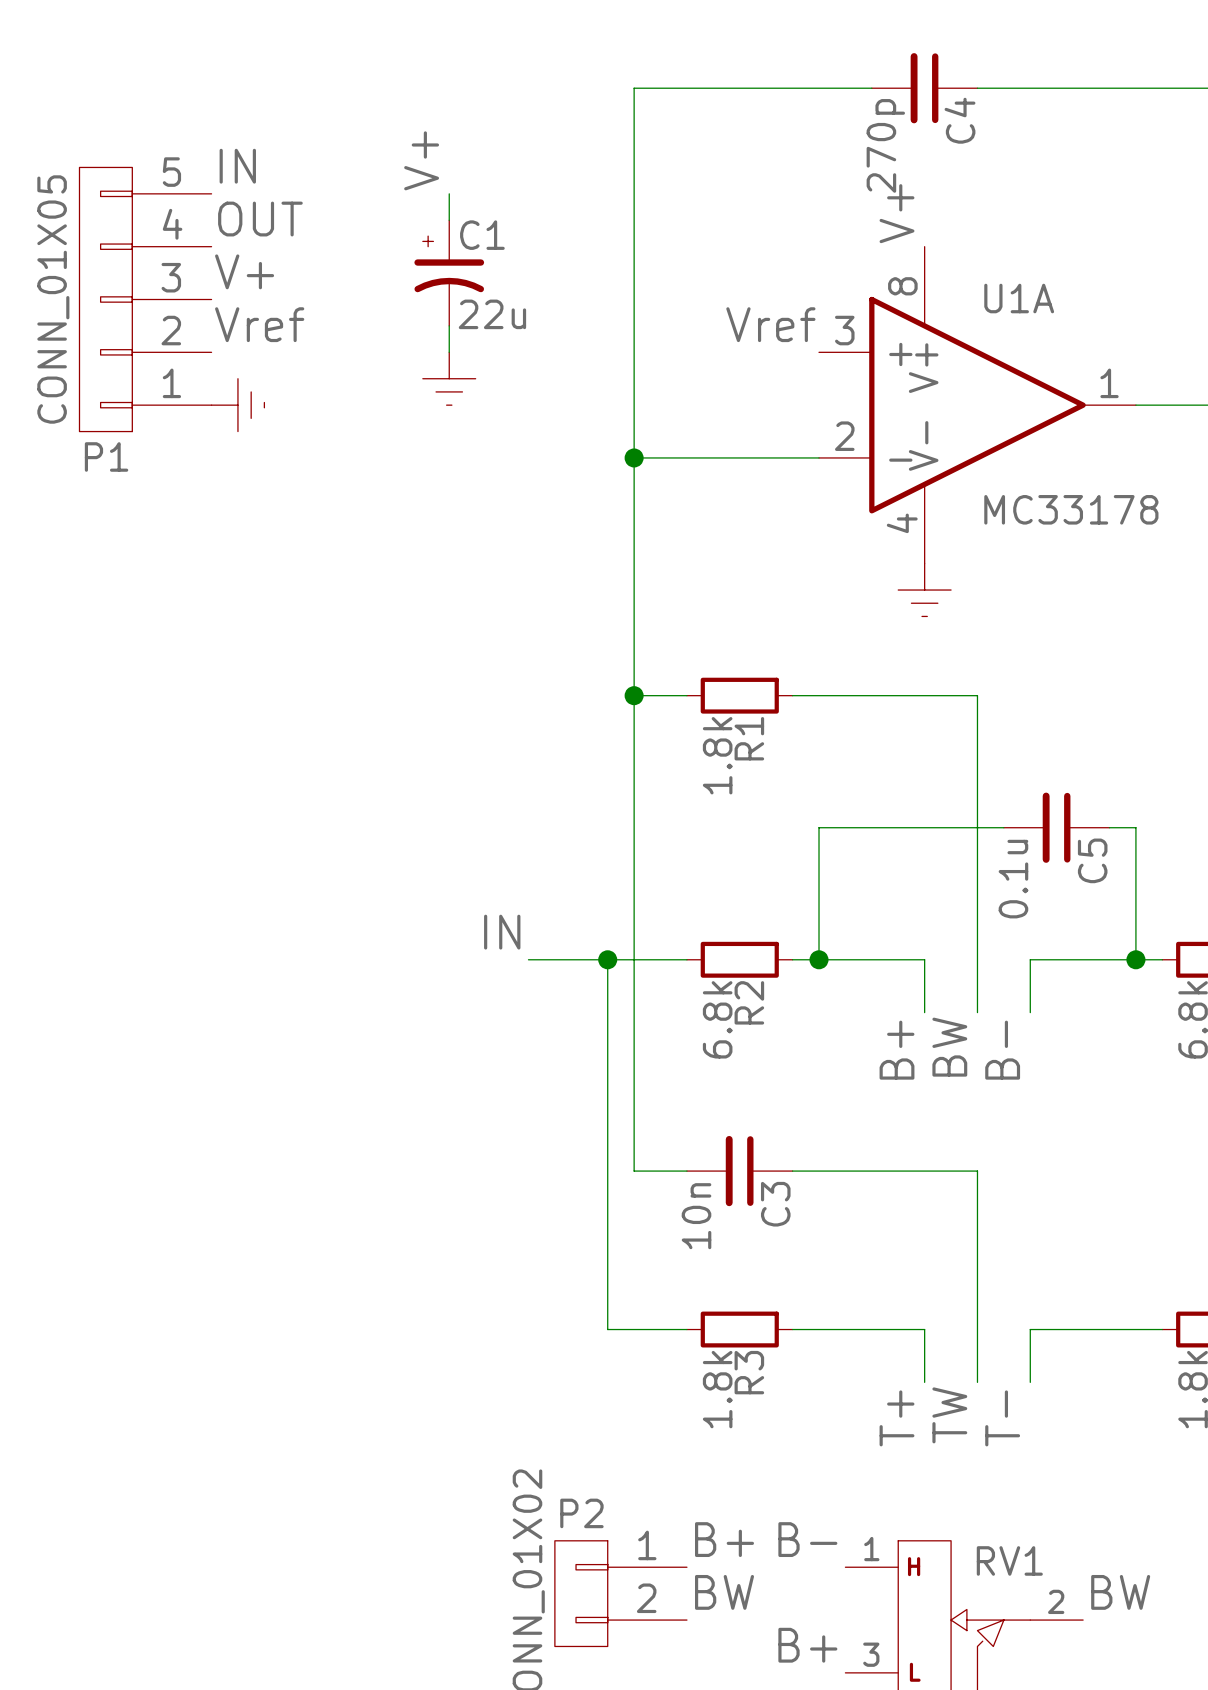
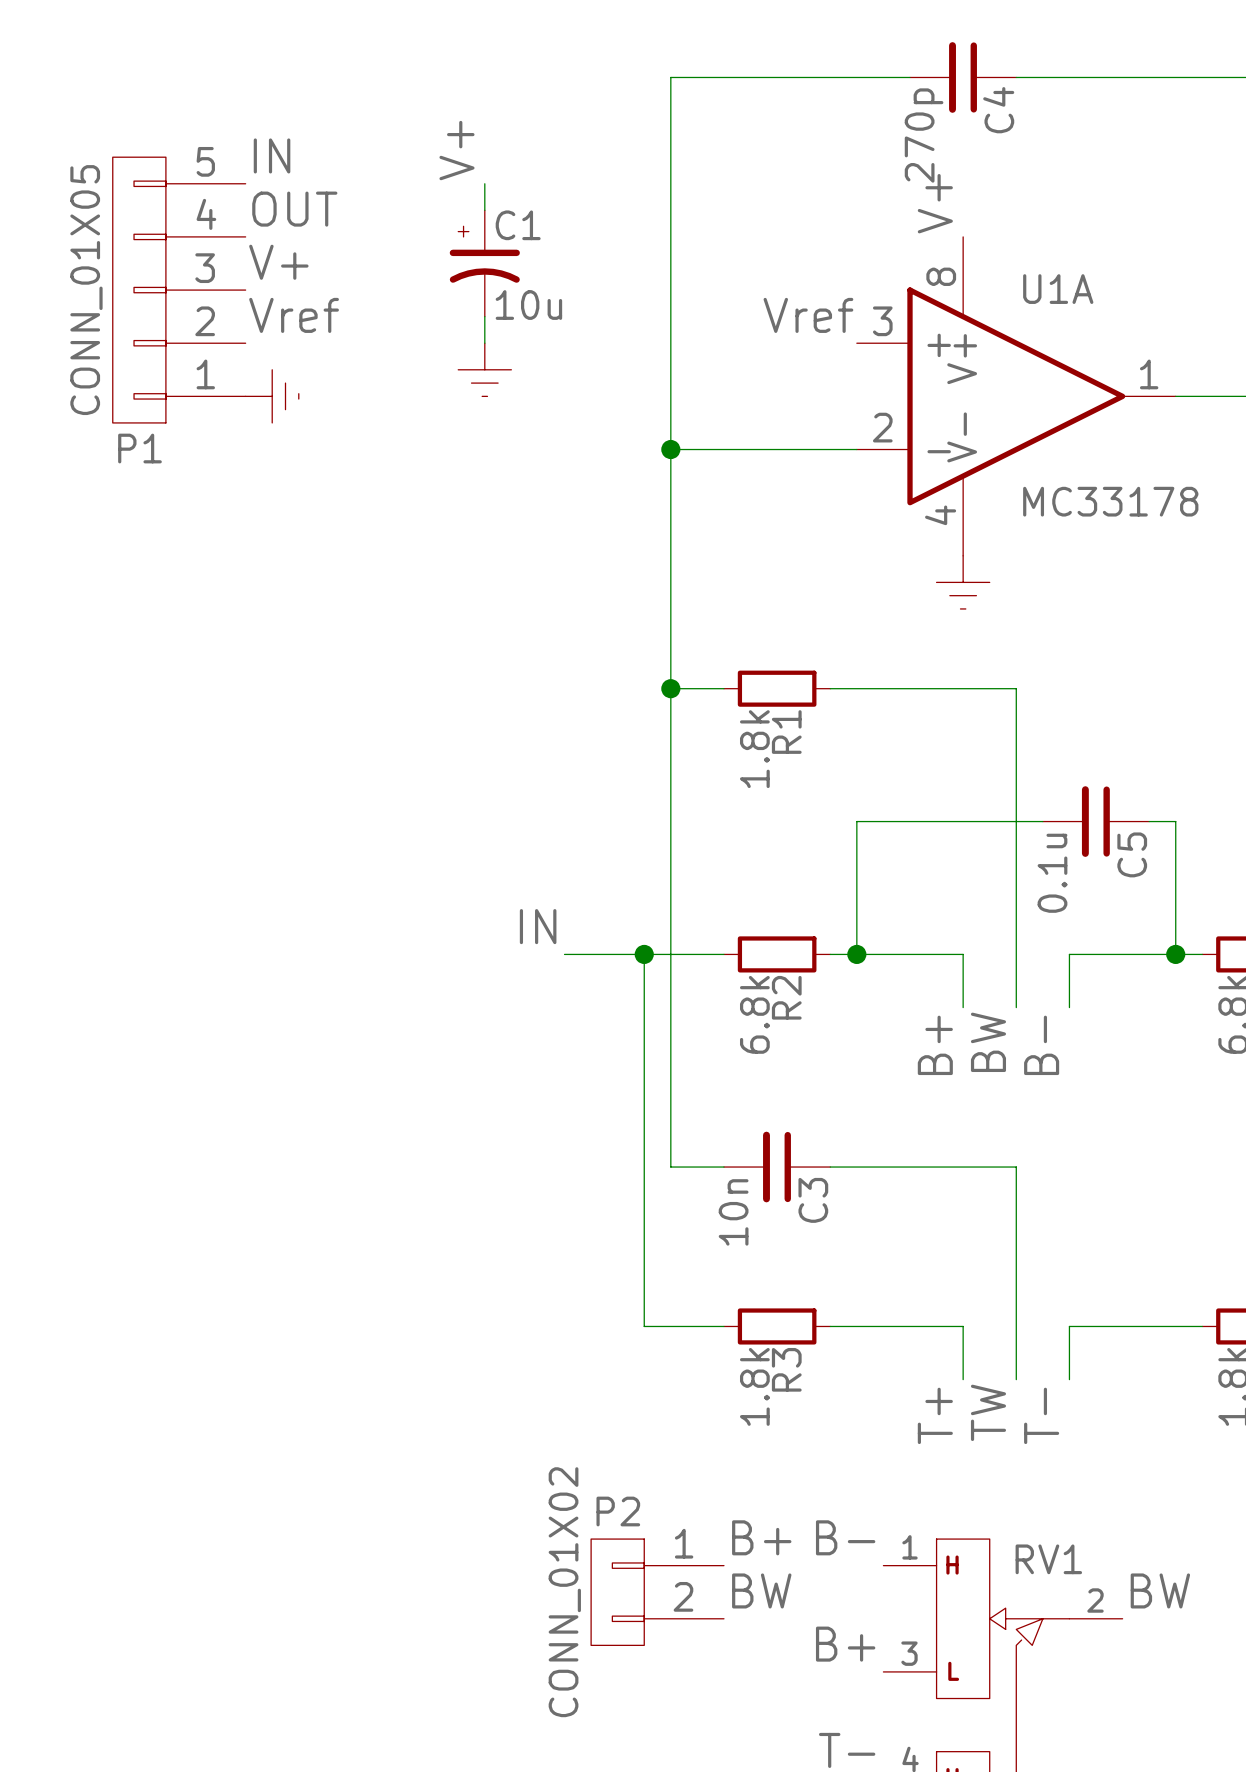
C1 value: 22u (492, 314) -> 10u (528, 305)

